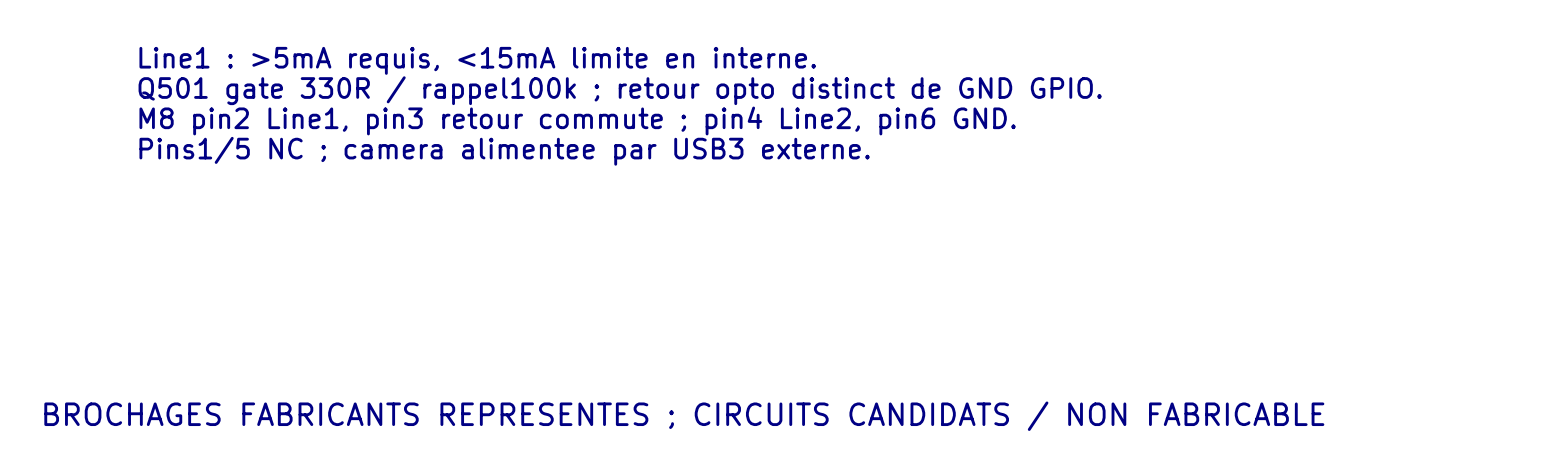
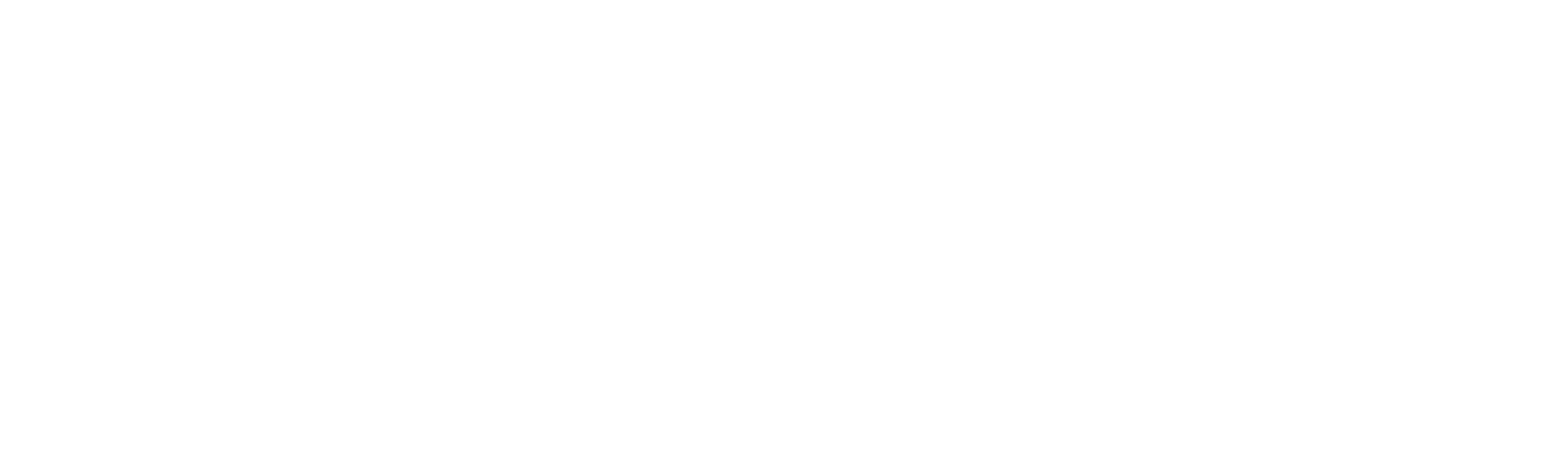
text: Line1 : >5mA requis, <15mA limite en interne. (477, 60) -> none
text: Q501 gate 330R / rappel100k ; retour opto distinct de GND GPIO. (620, 90) -> none
text: M8 pin2 Line1, pin3 retour commute ; pin4 Line2, pin6 GND. (577, 120) -> none
text: Pins1/5 NC ; camera alimentee par USB3 externe. (504, 151) -> none
text: BROCHAGES FABRICANTS REPRESENTES ; CIRCUITS CANDIDATS / NON FABRICABLE (684, 416) -> none

